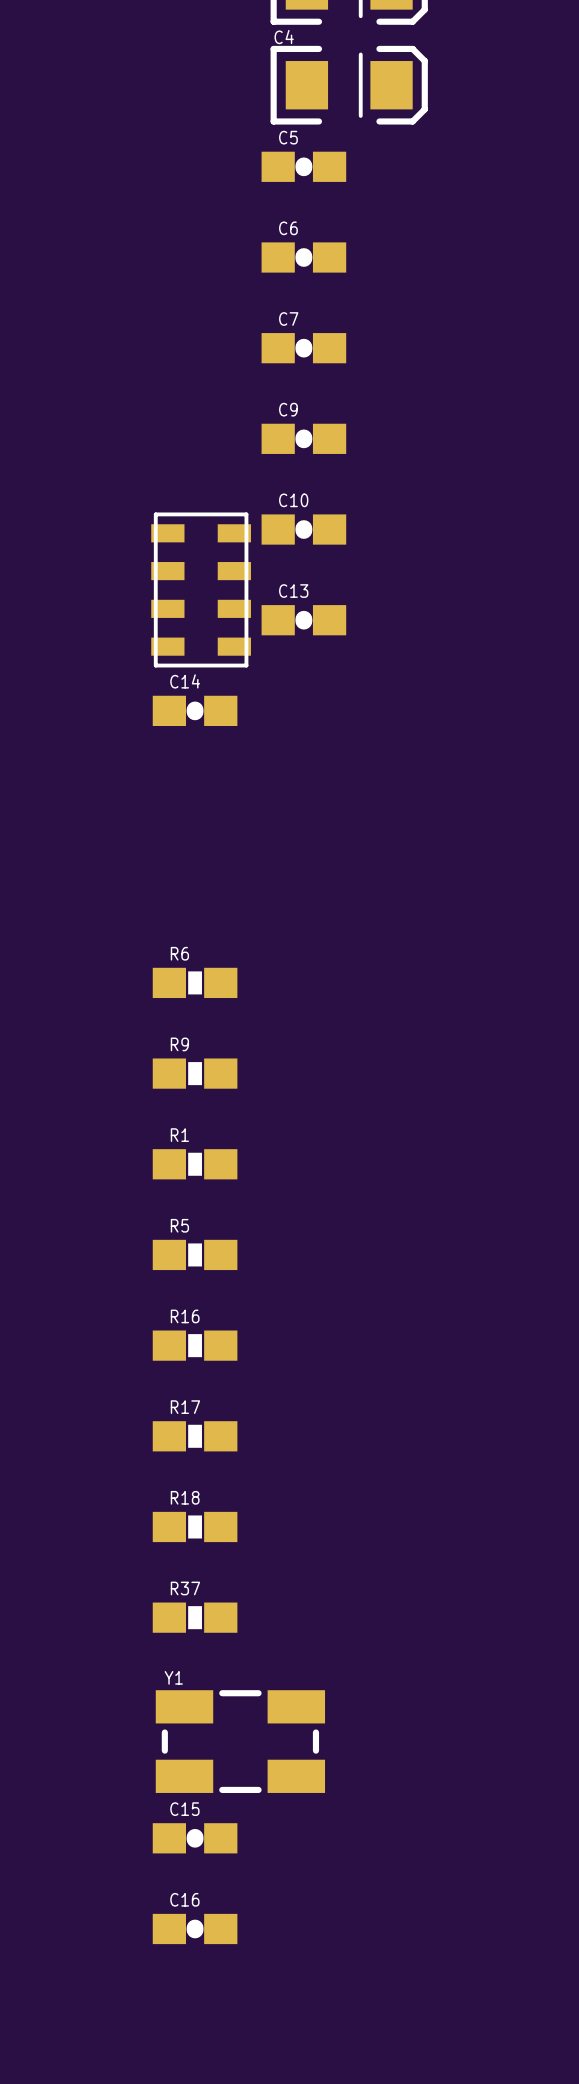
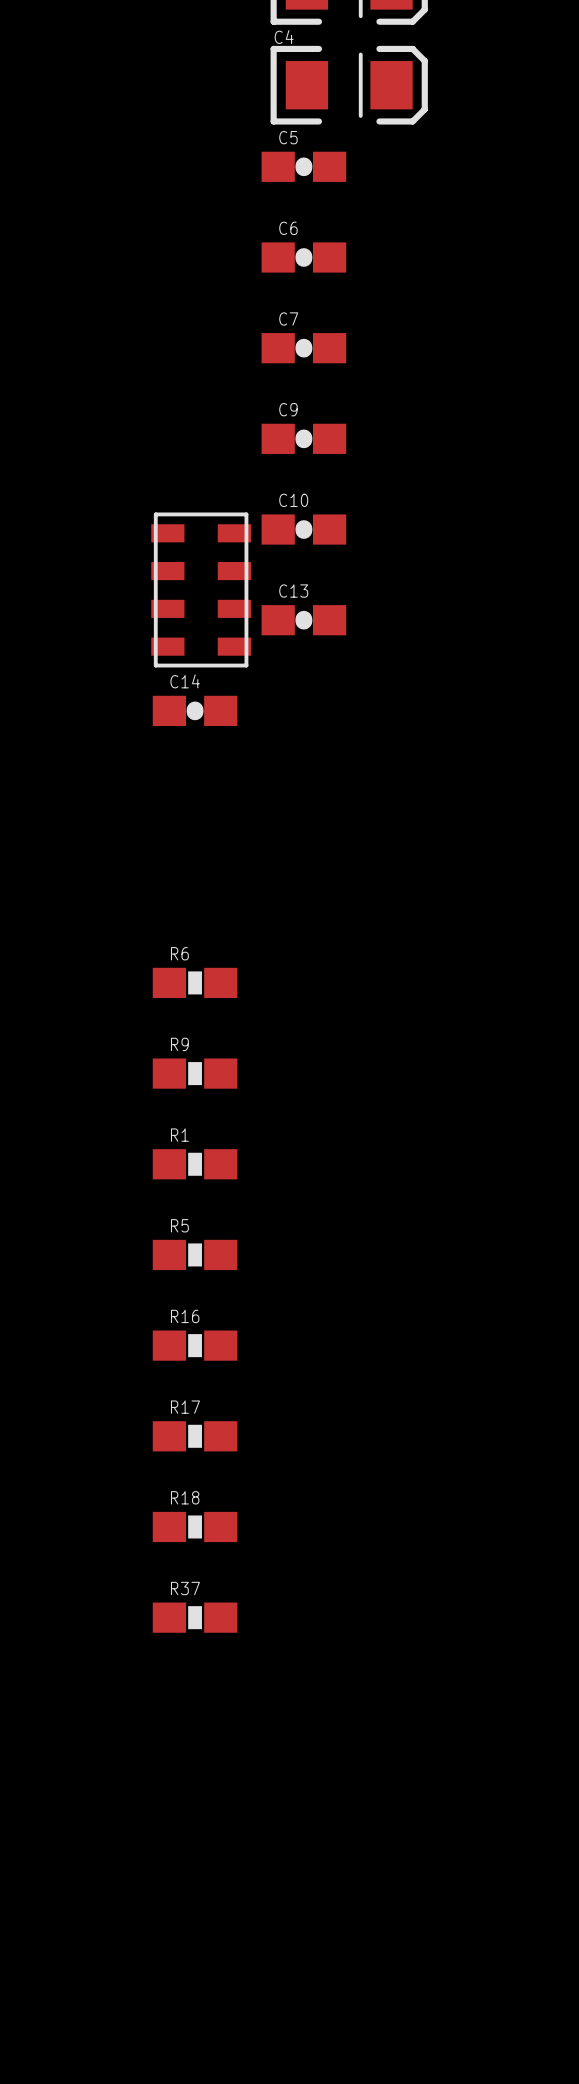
Y1: (240, 1741) -> none
C15: (195, 1838) -> none
C16: (195, 1928) -> none

